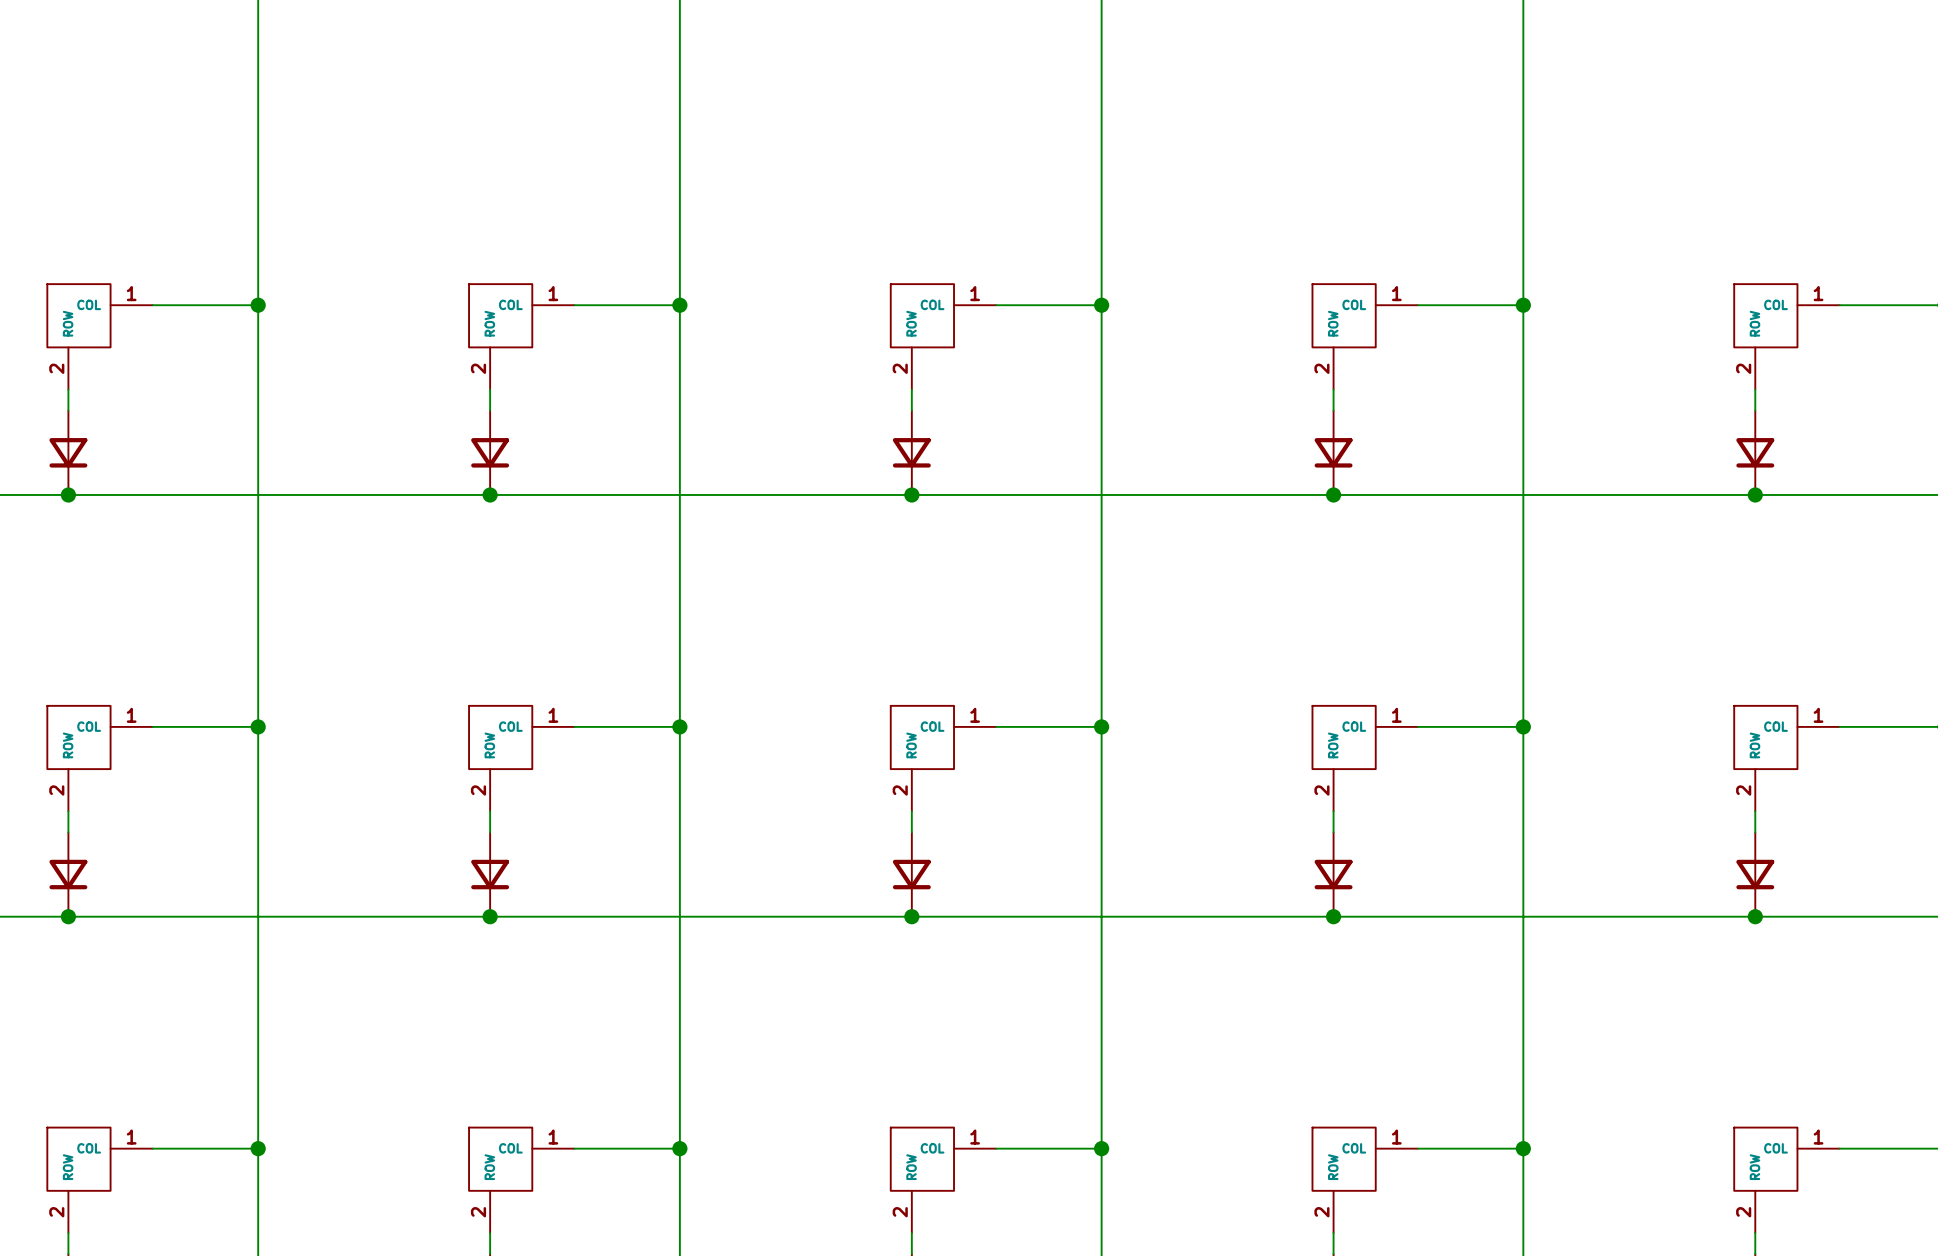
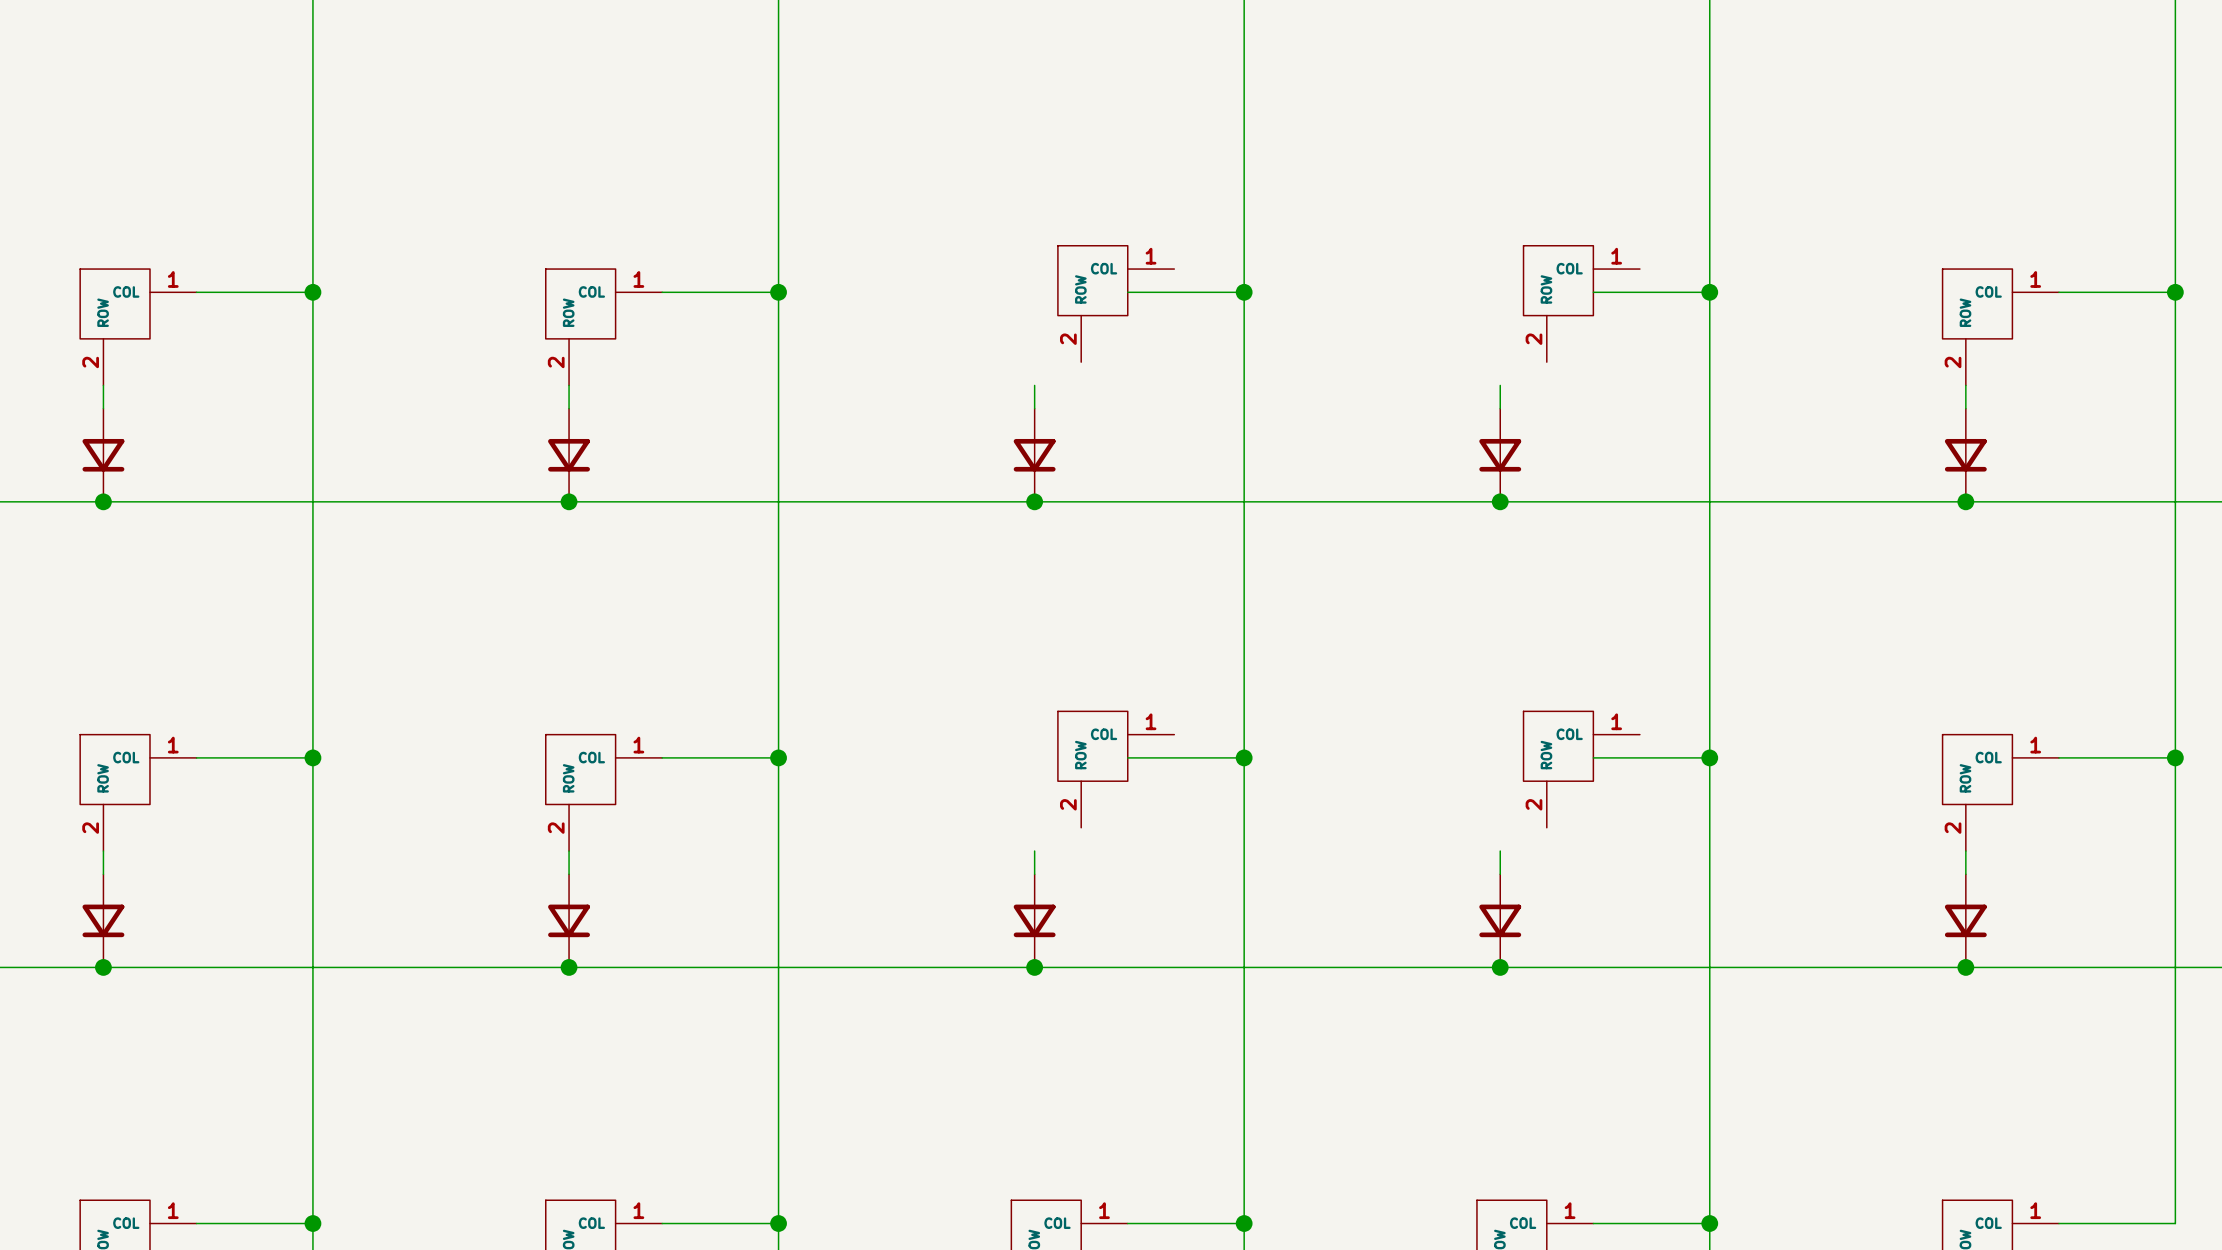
part position: (943, 336) -> (1116, 303)
part position: (1365, 336) -> (1581, 303)
part position: (943, 758) -> (1116, 769)
part position: (1365, 758) -> (1581, 769)

